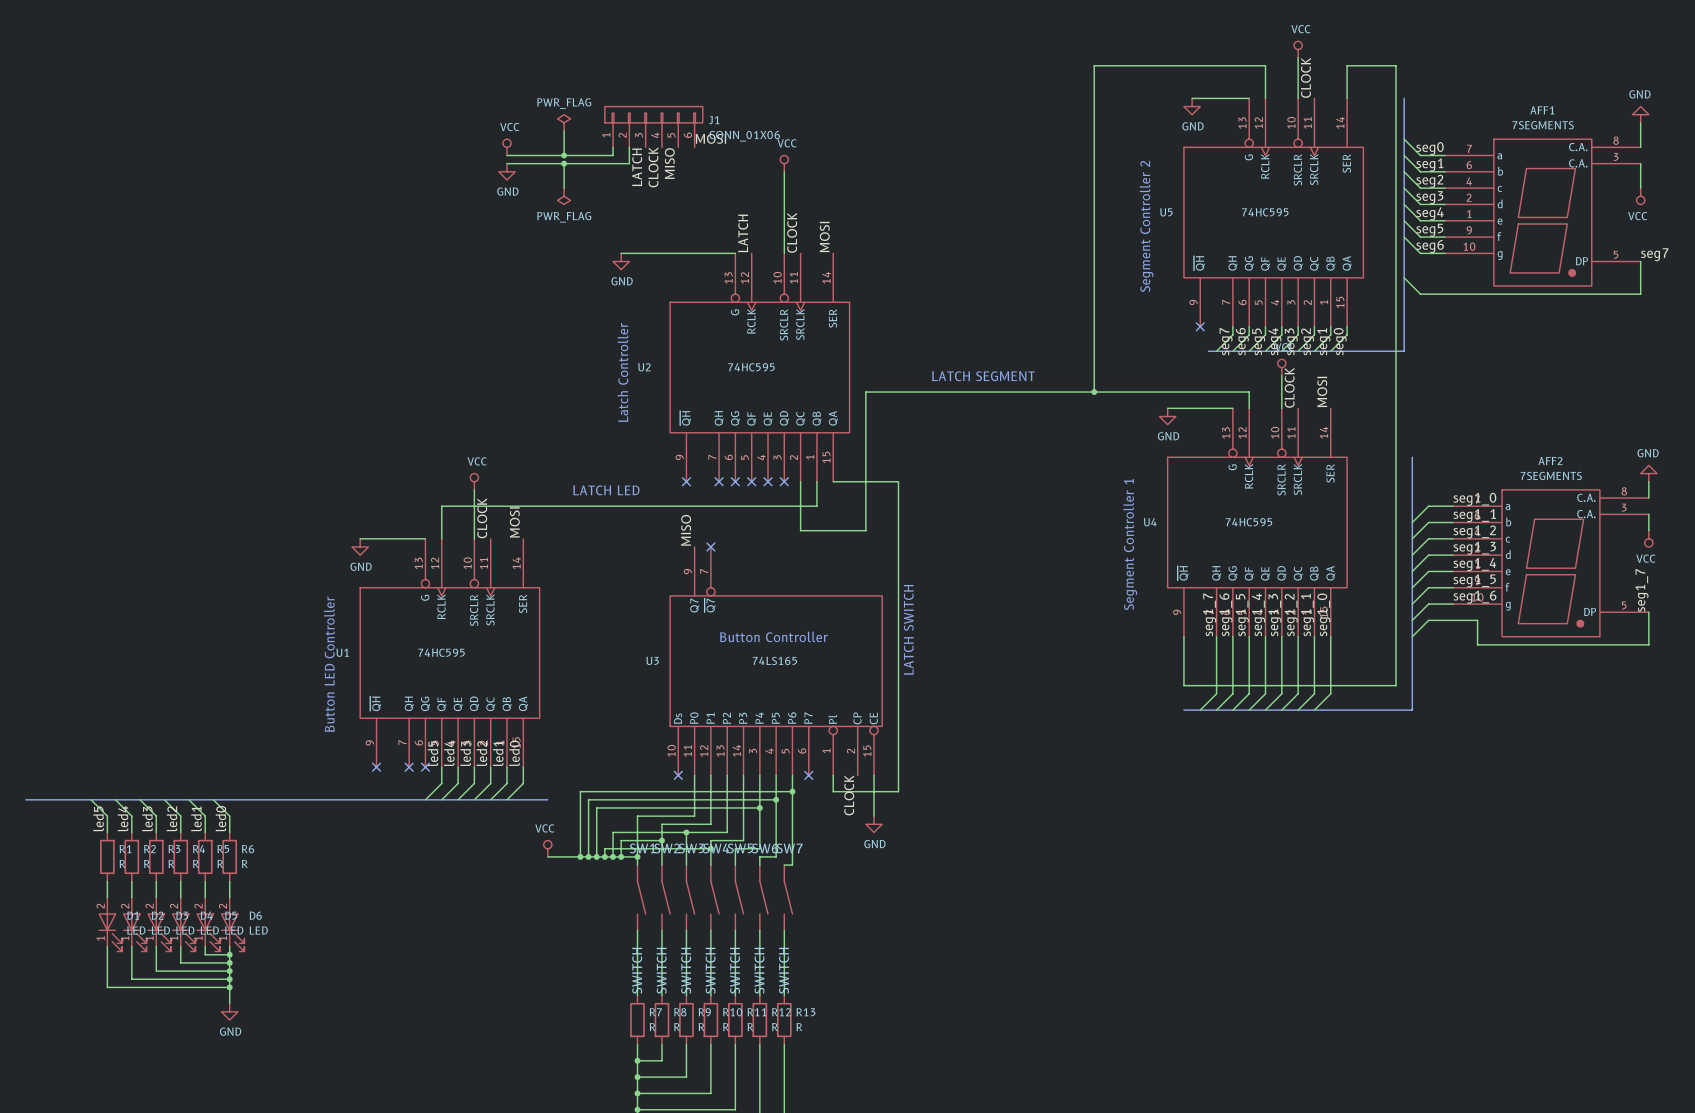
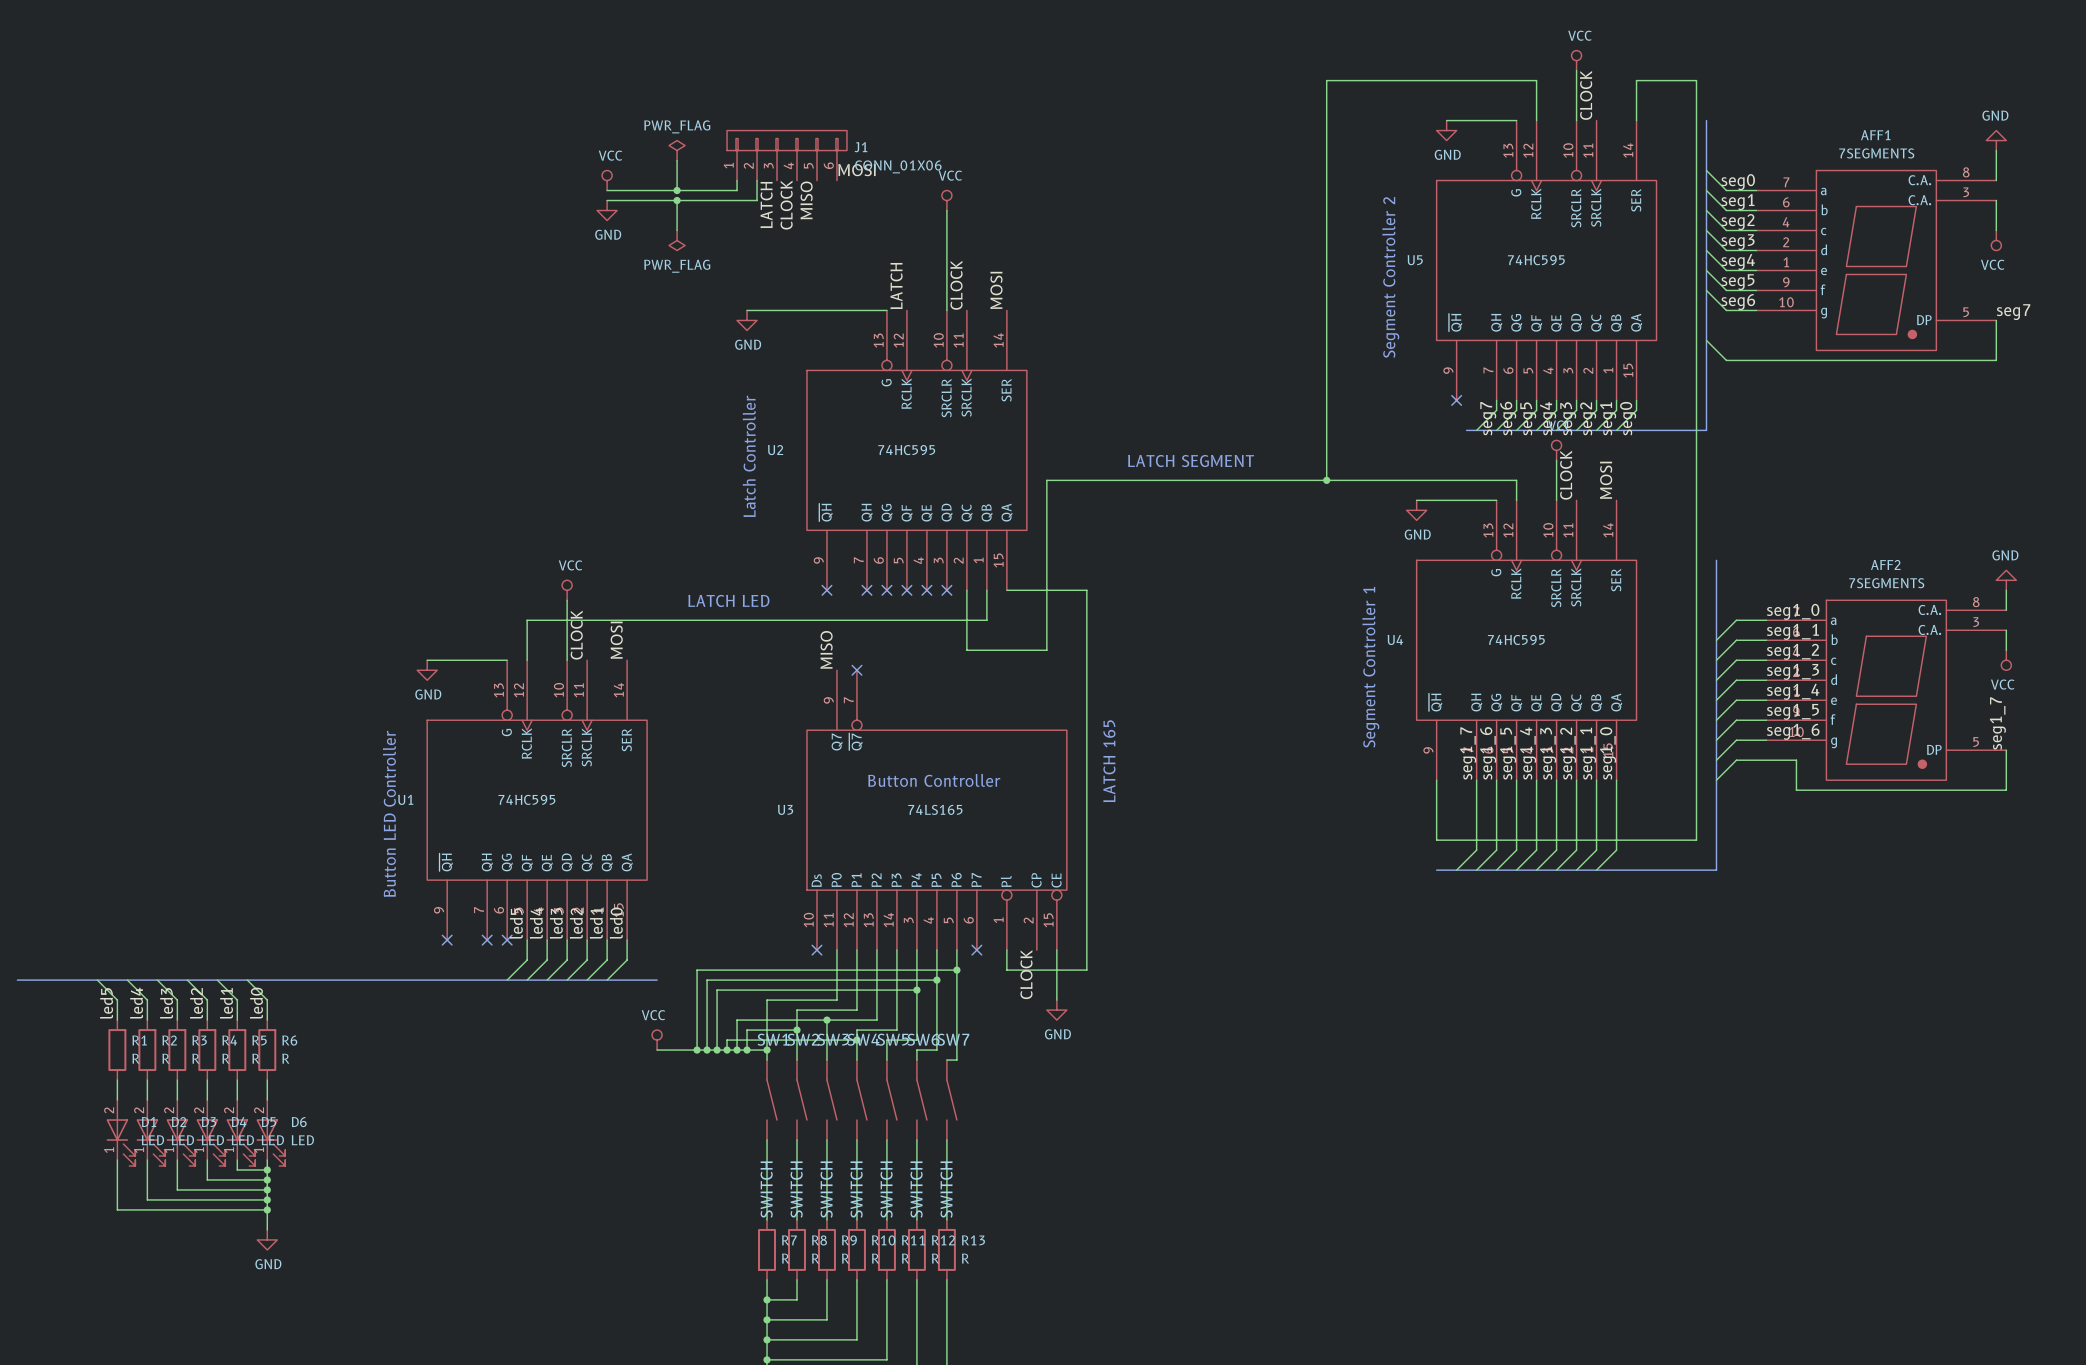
text: none -> LATCH 165 (1109, 761)
text: LATCH SWITCH (908, 629) -> none

